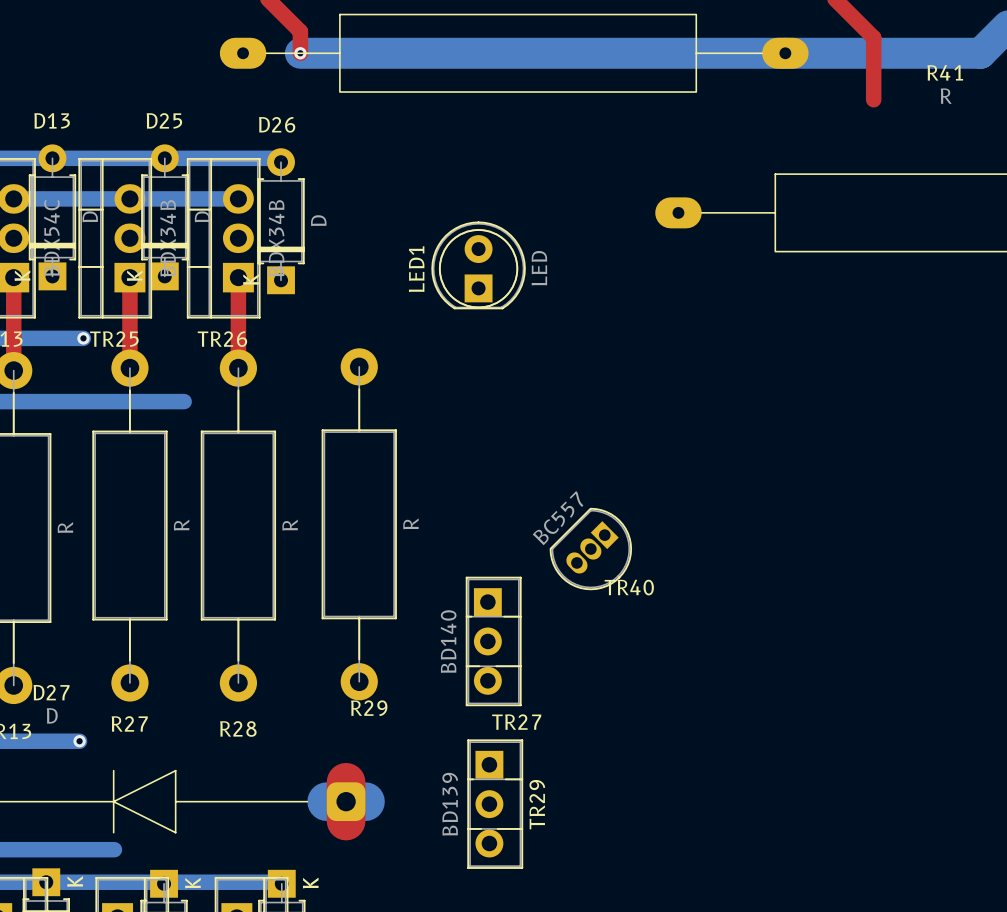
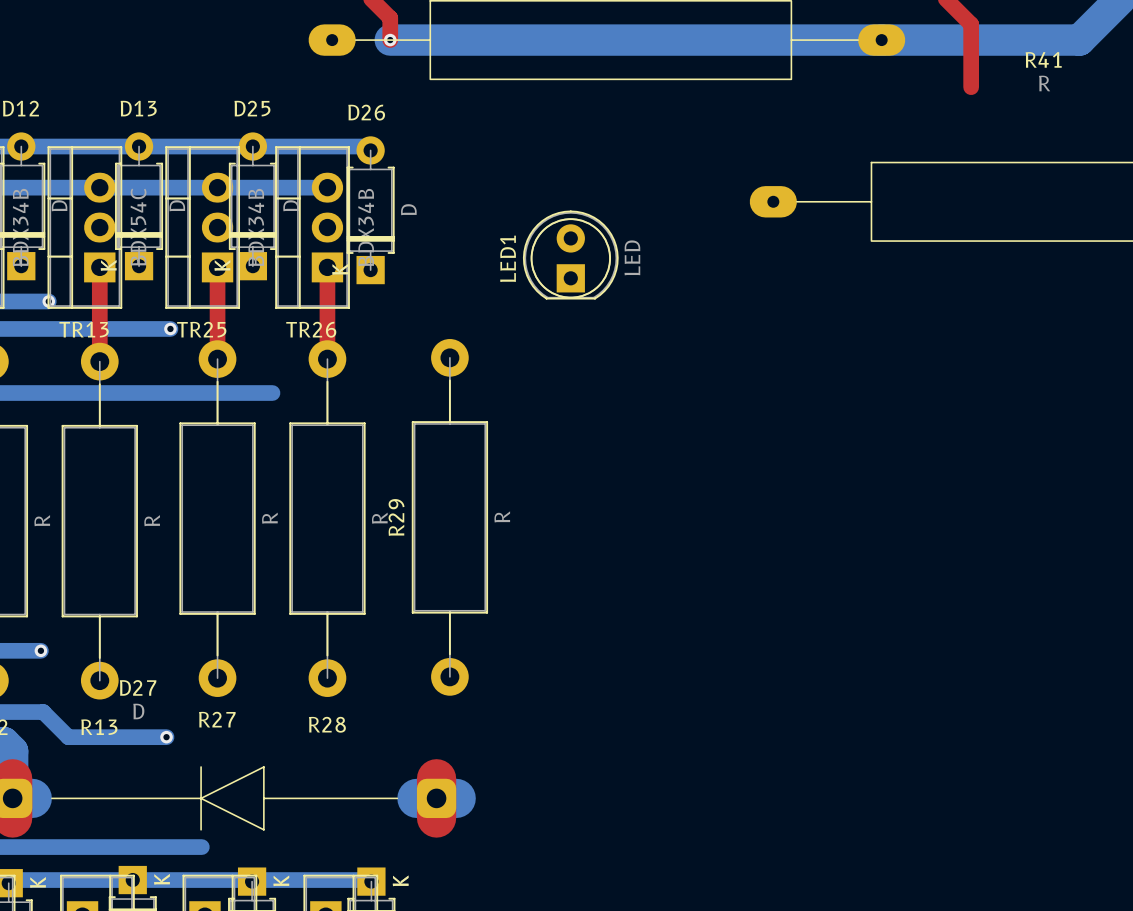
TR40: BC557 (590, 549) -> none
TR27: BD140 (493, 641) -> none
R29 name rotation: 0° (369, 708) -> 90° counterclockwise (396, 517)
R29 name position: R29 (369, 708) -> R29 (396, 517)
TR29: BD139 (495, 804) -> none

